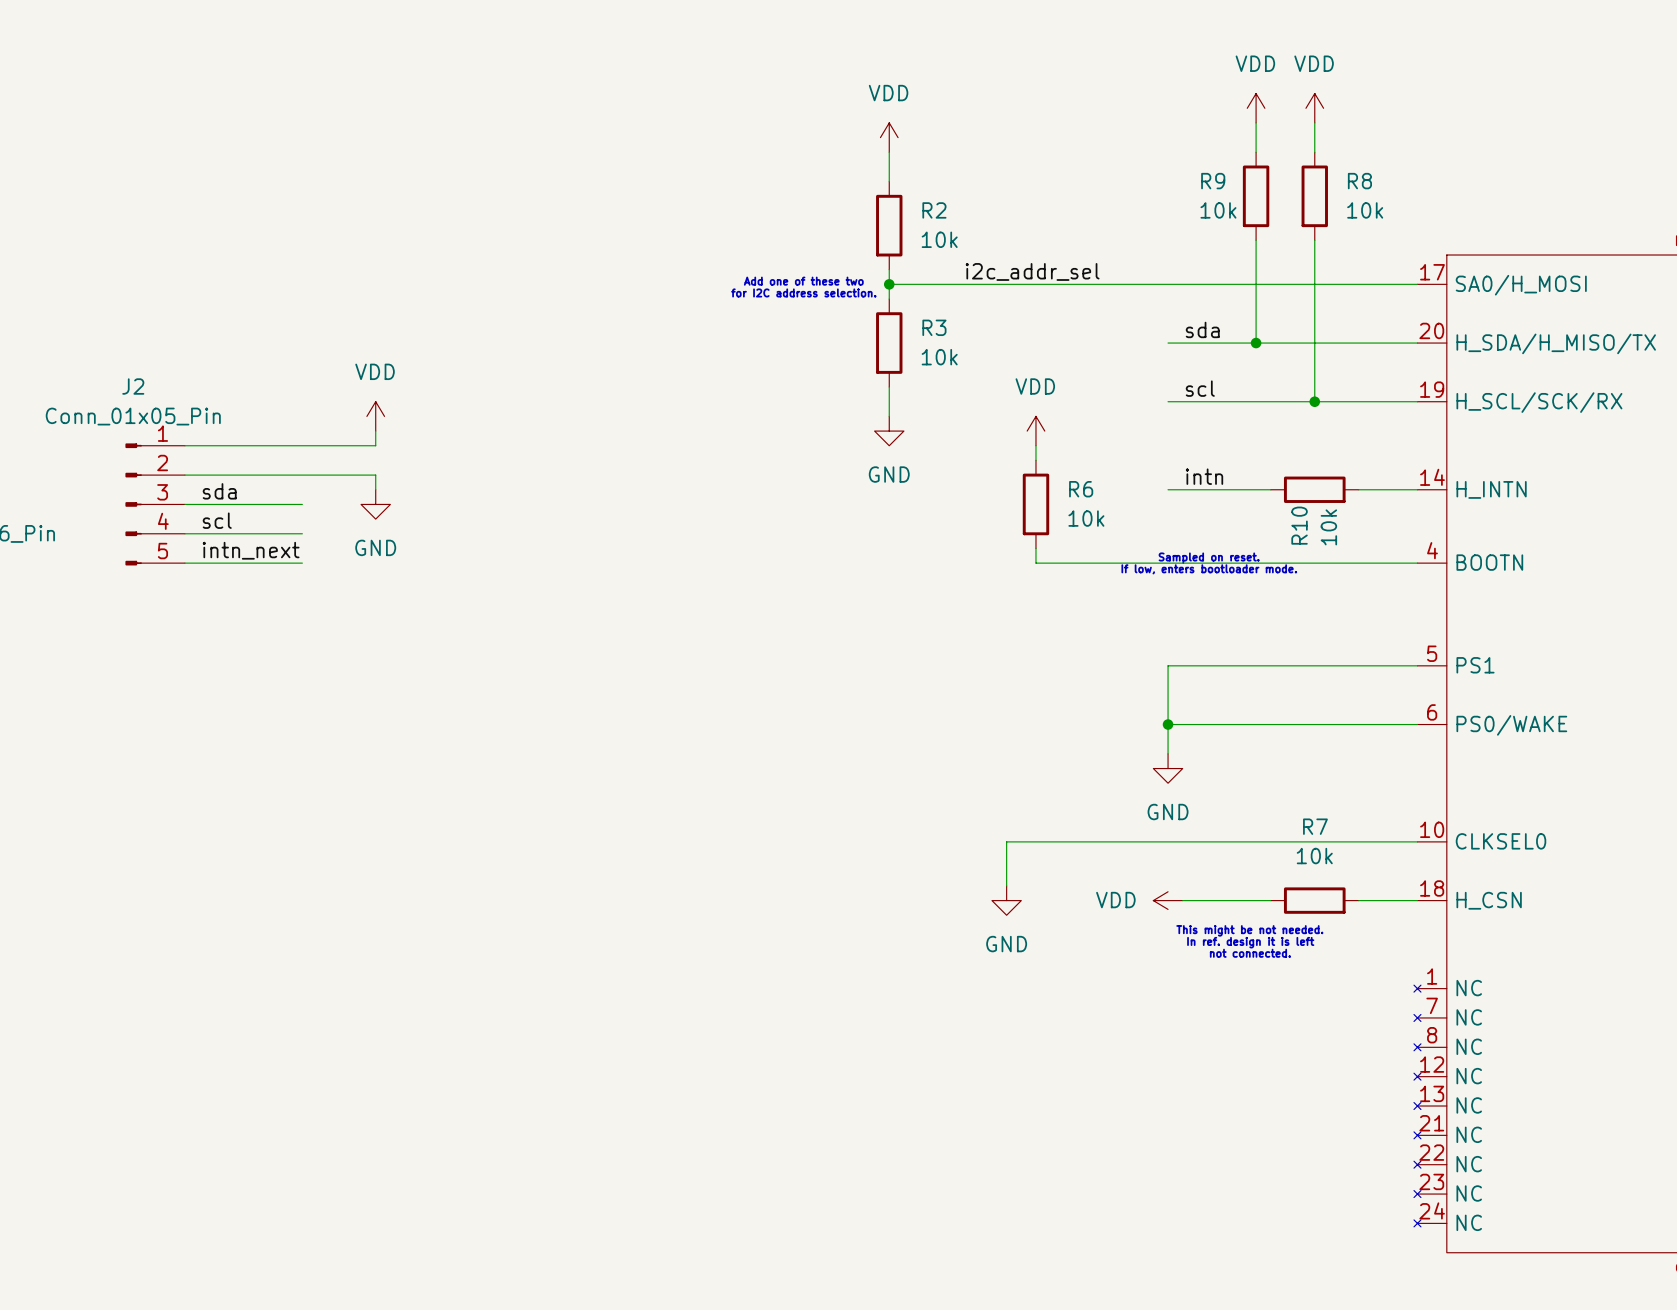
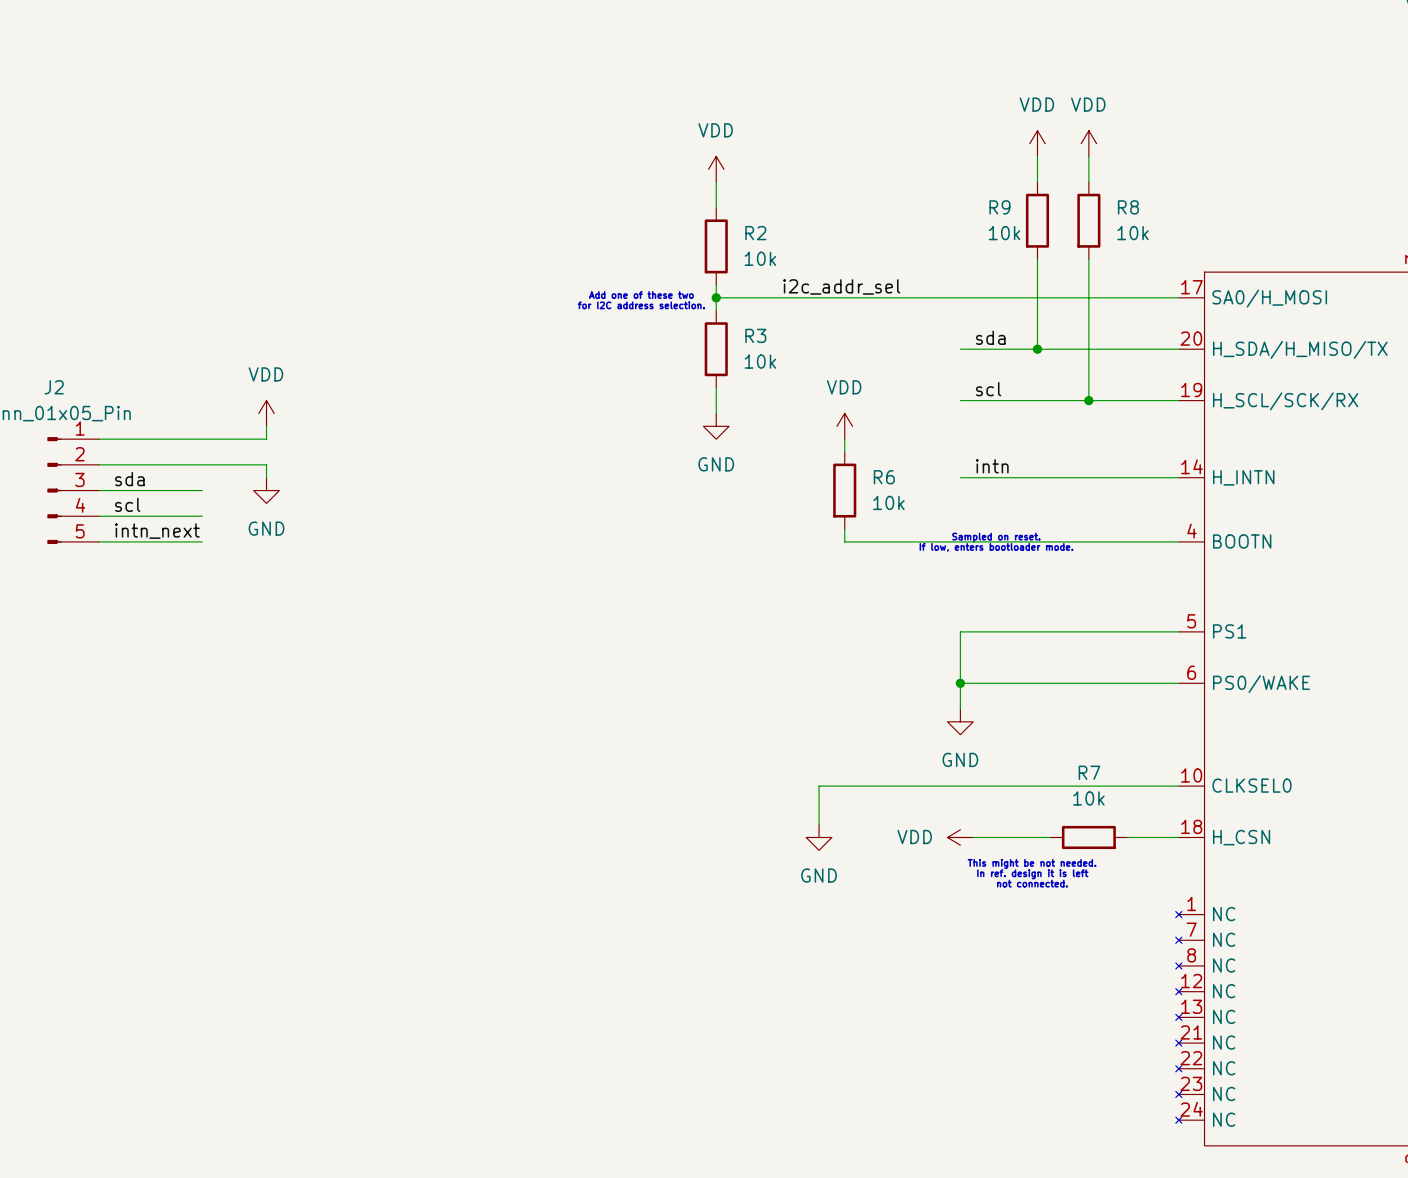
wire: none -> (1050, 477) (1127, 477)
R10: 10k (1314, 489) -> none

